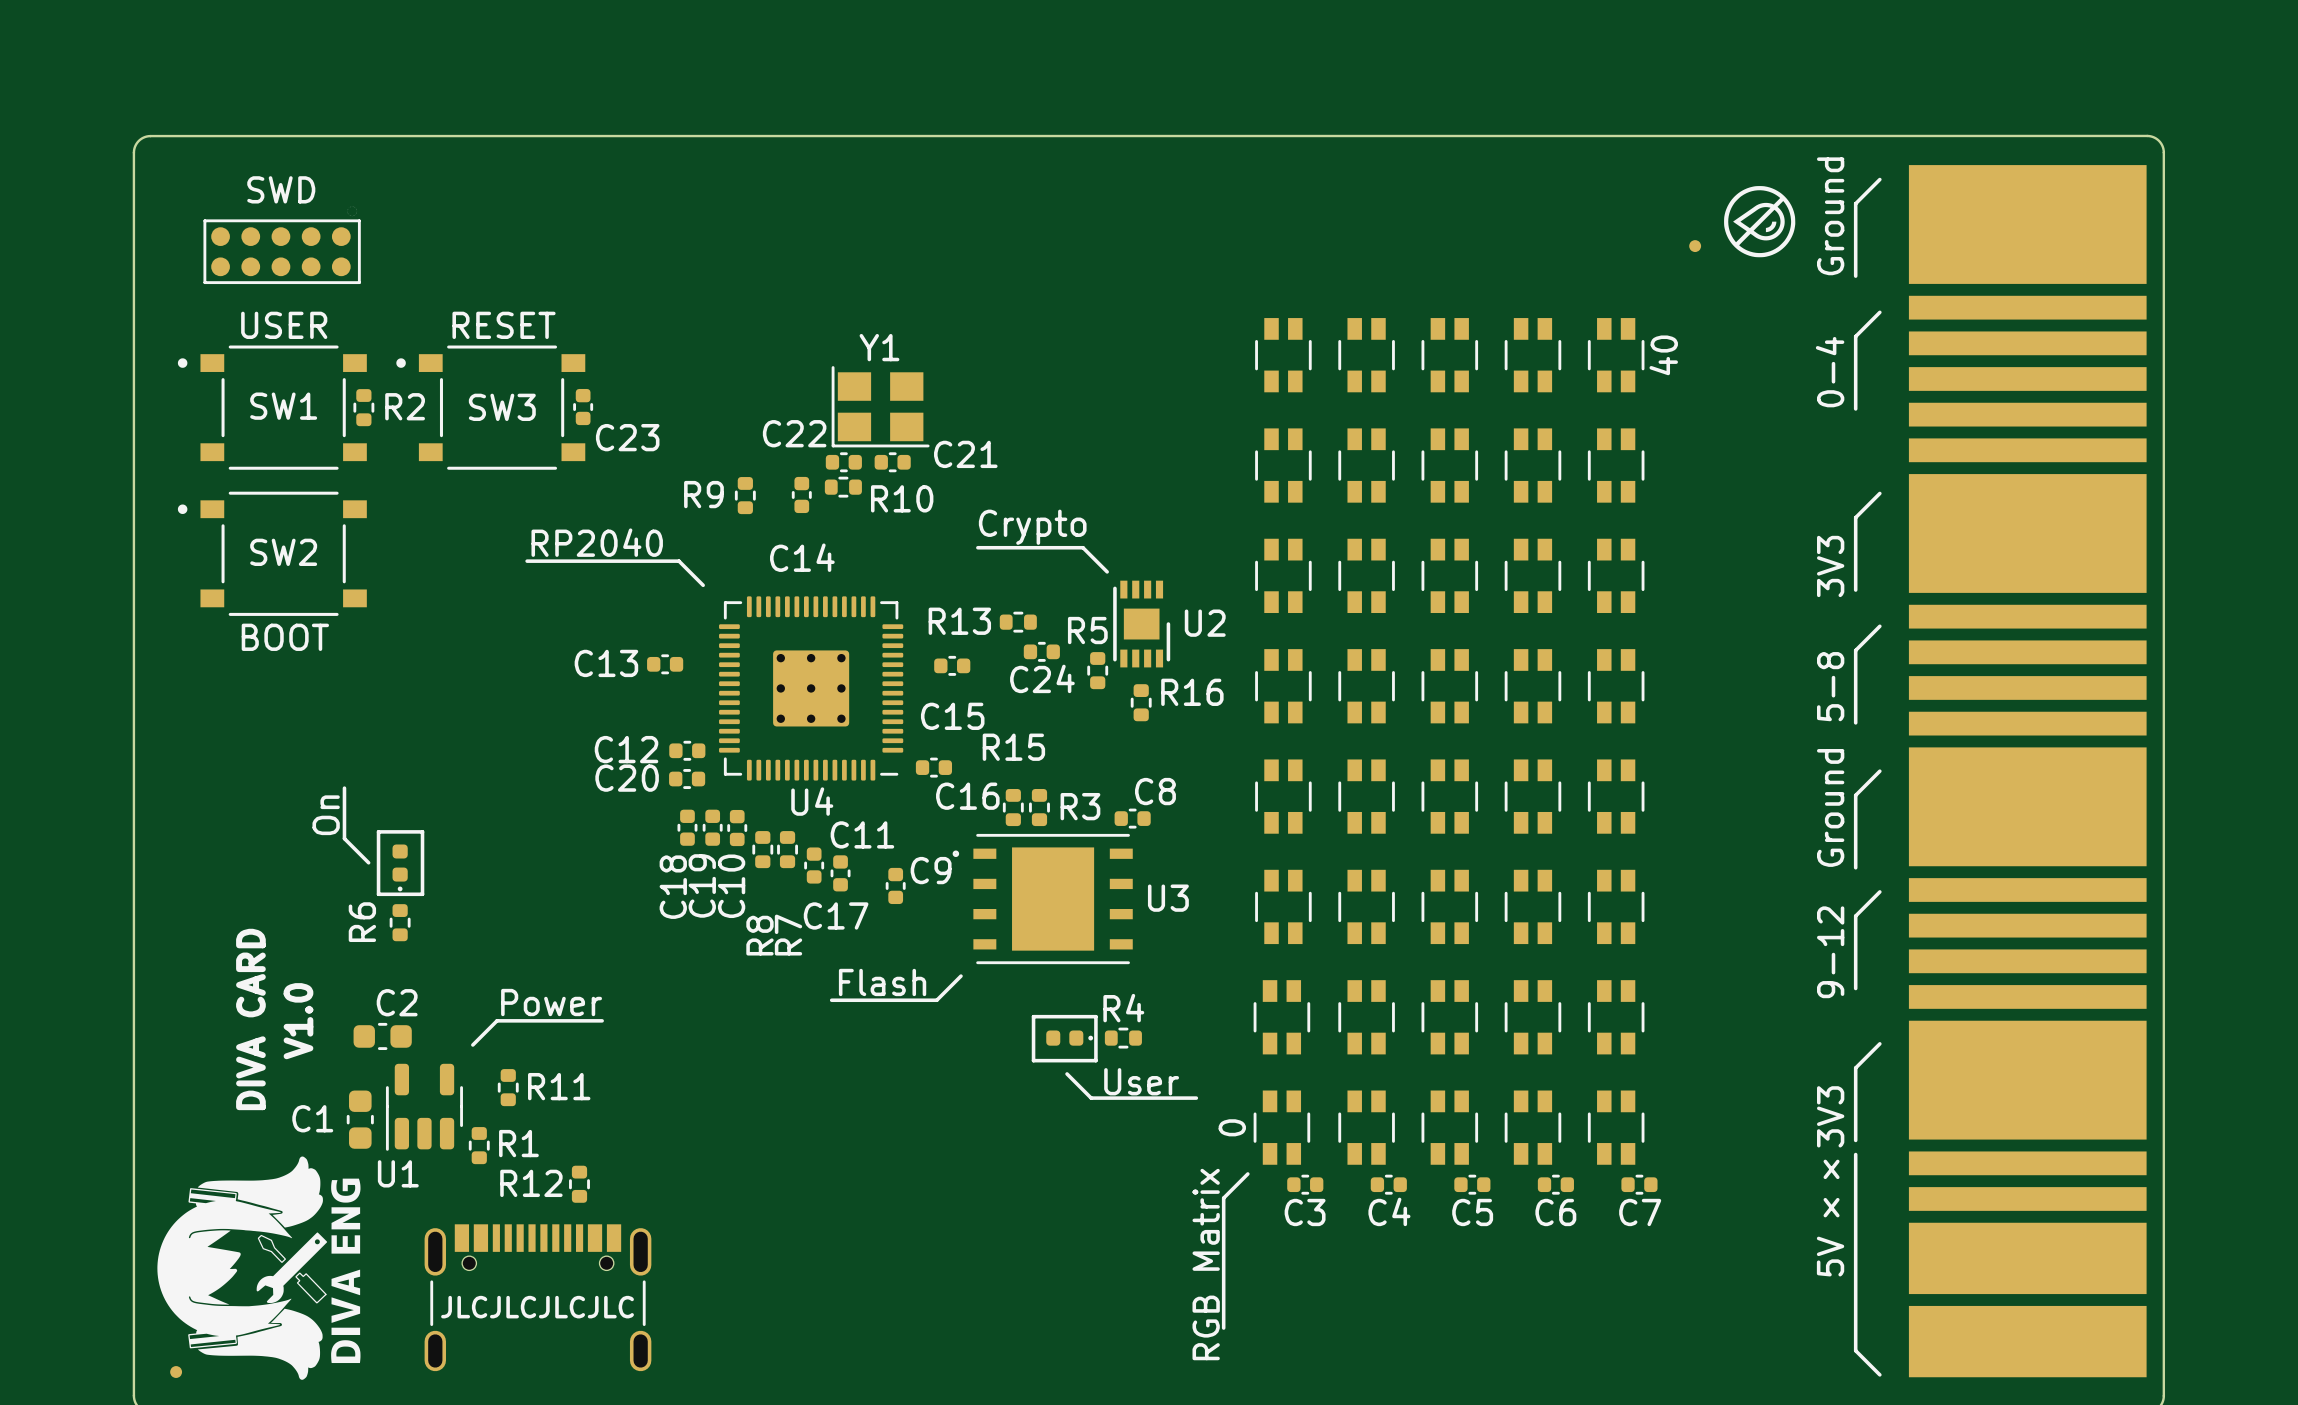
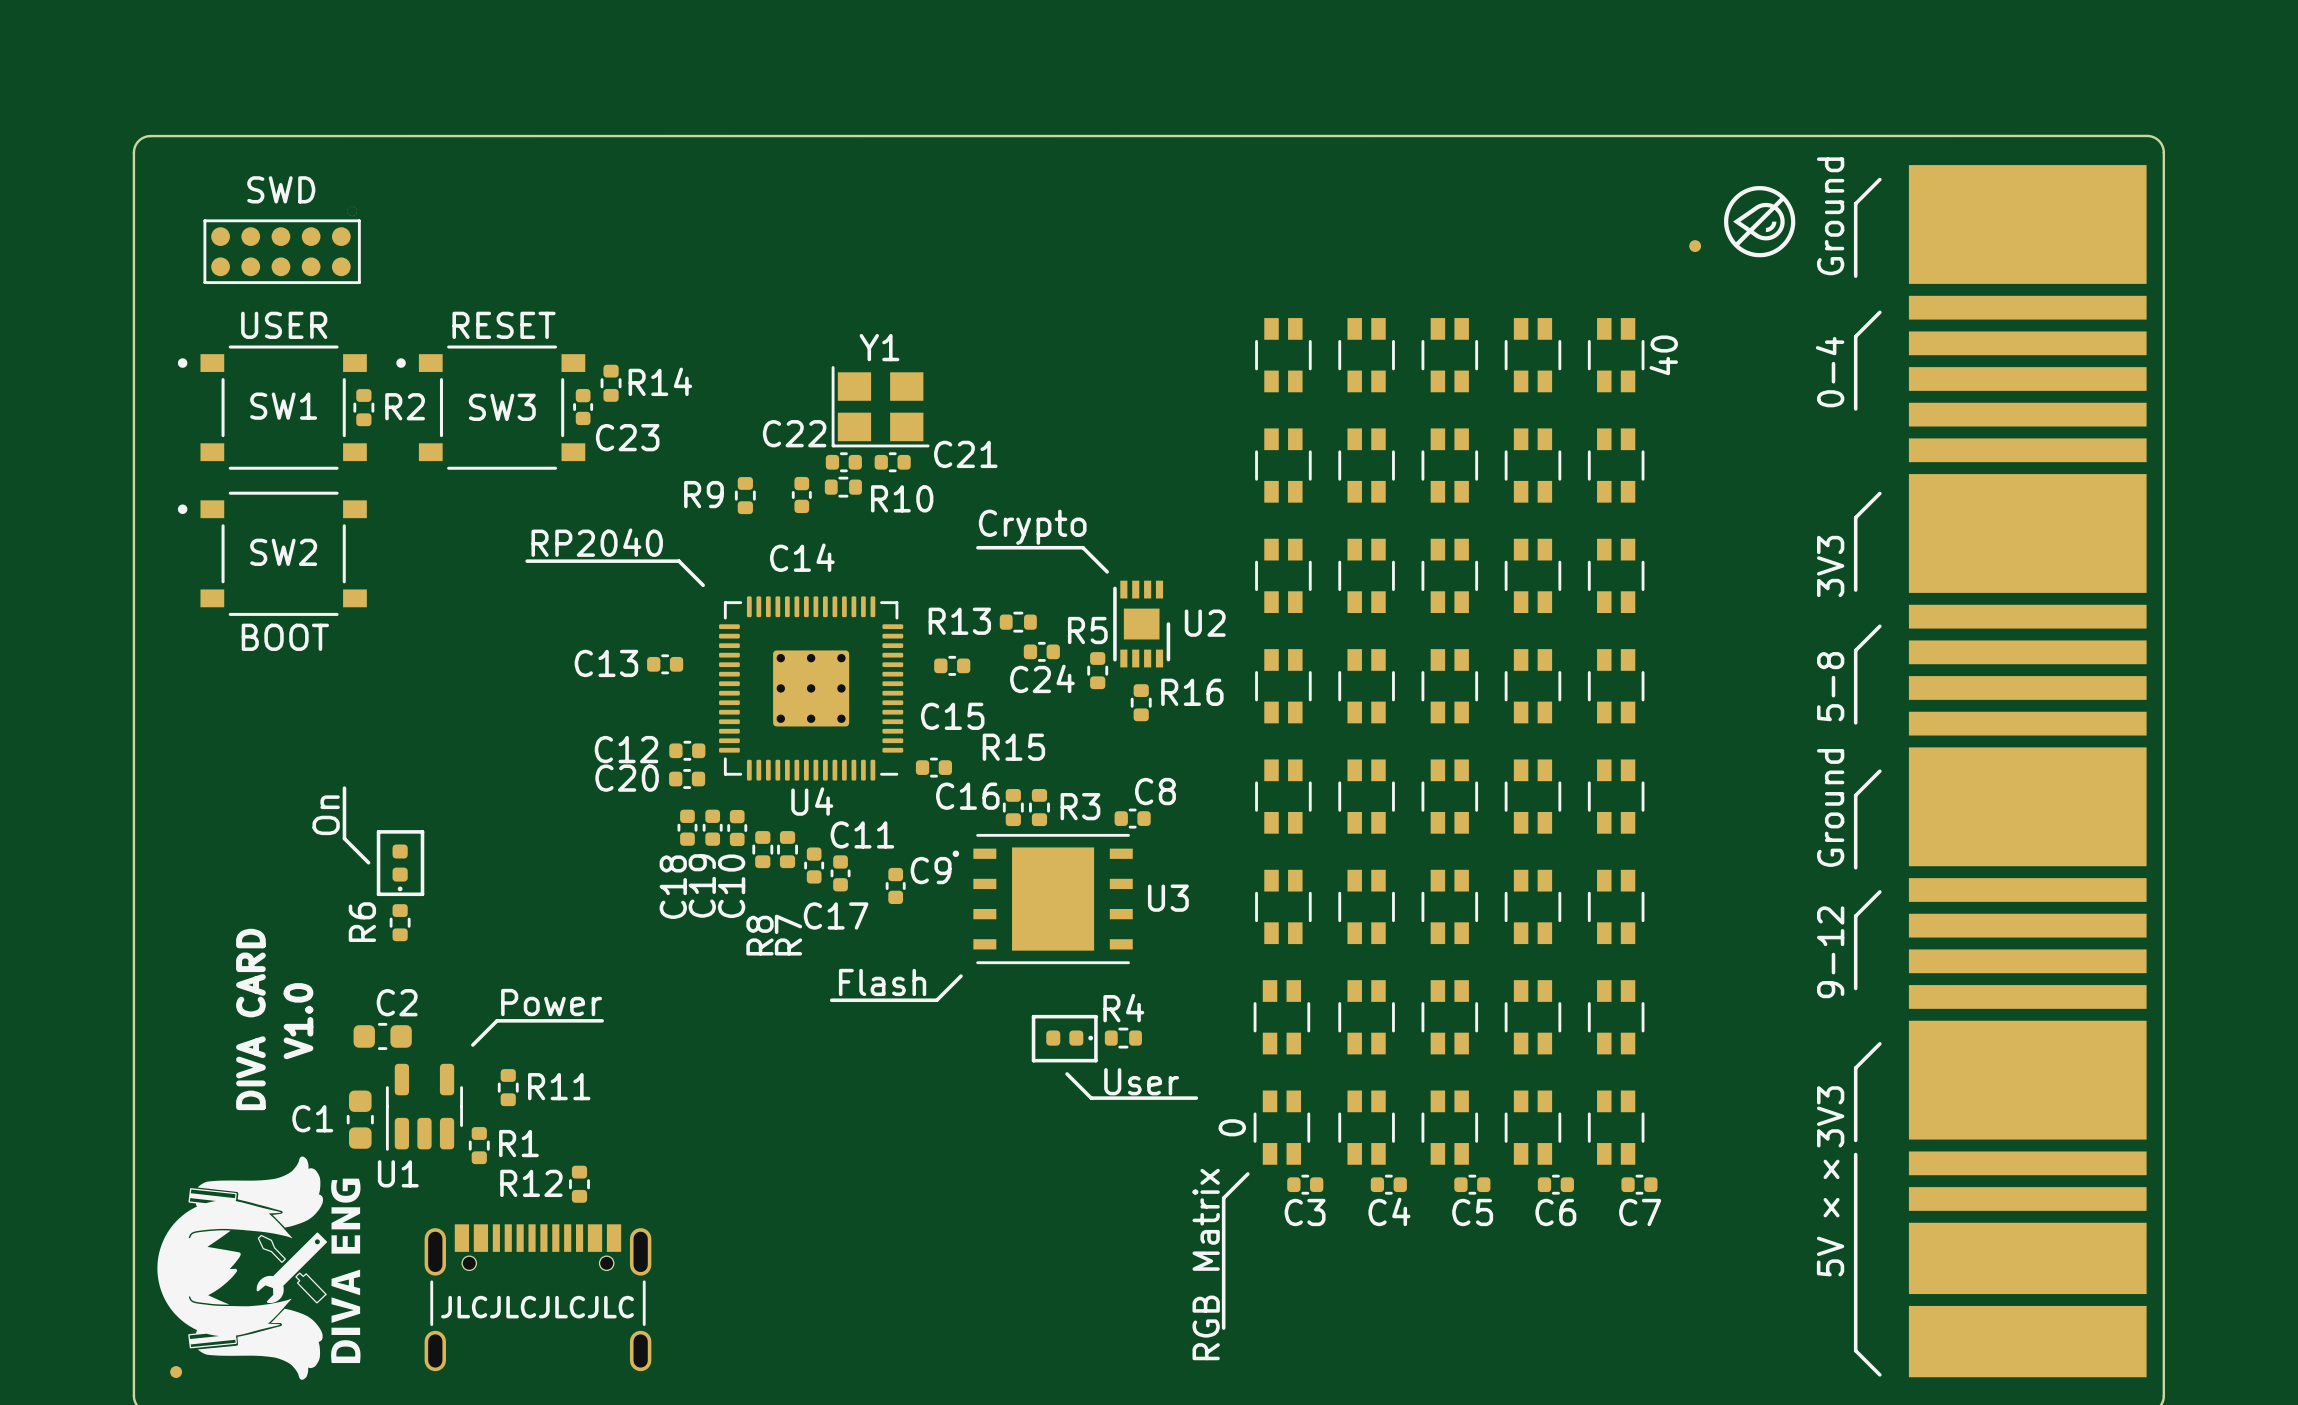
R14: none -> (611, 383)

